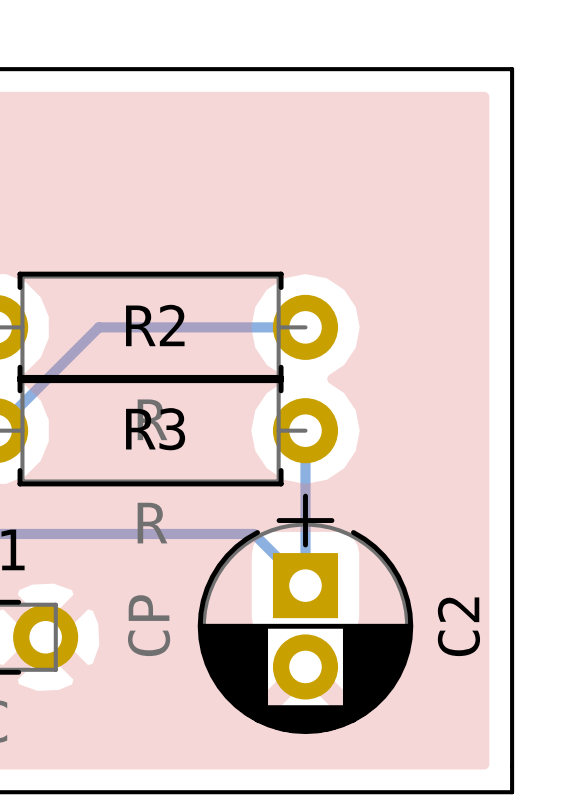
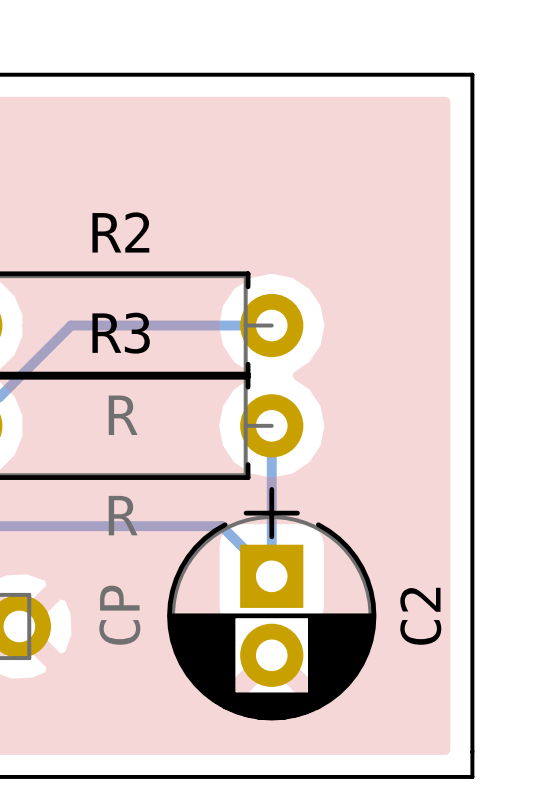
R2 name position: R2 (155, 325) -> R2 (120, 232)
R3 name position: R3 (155, 429) -> R3 (121, 333)

